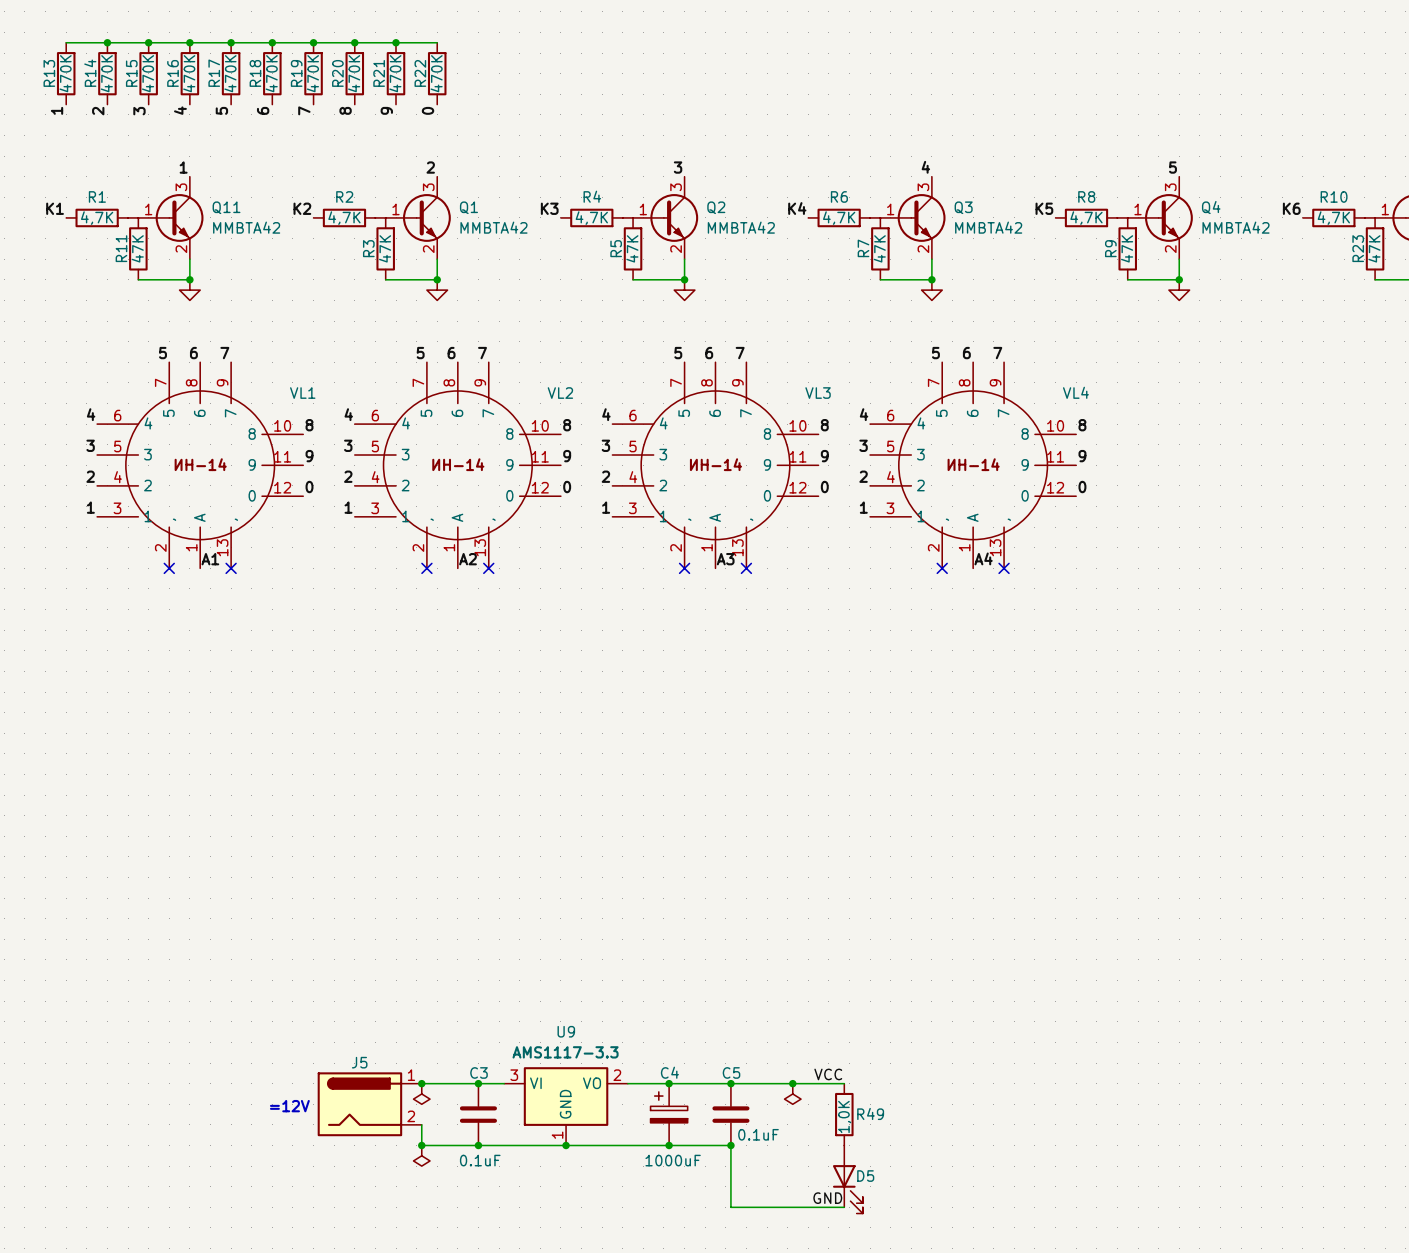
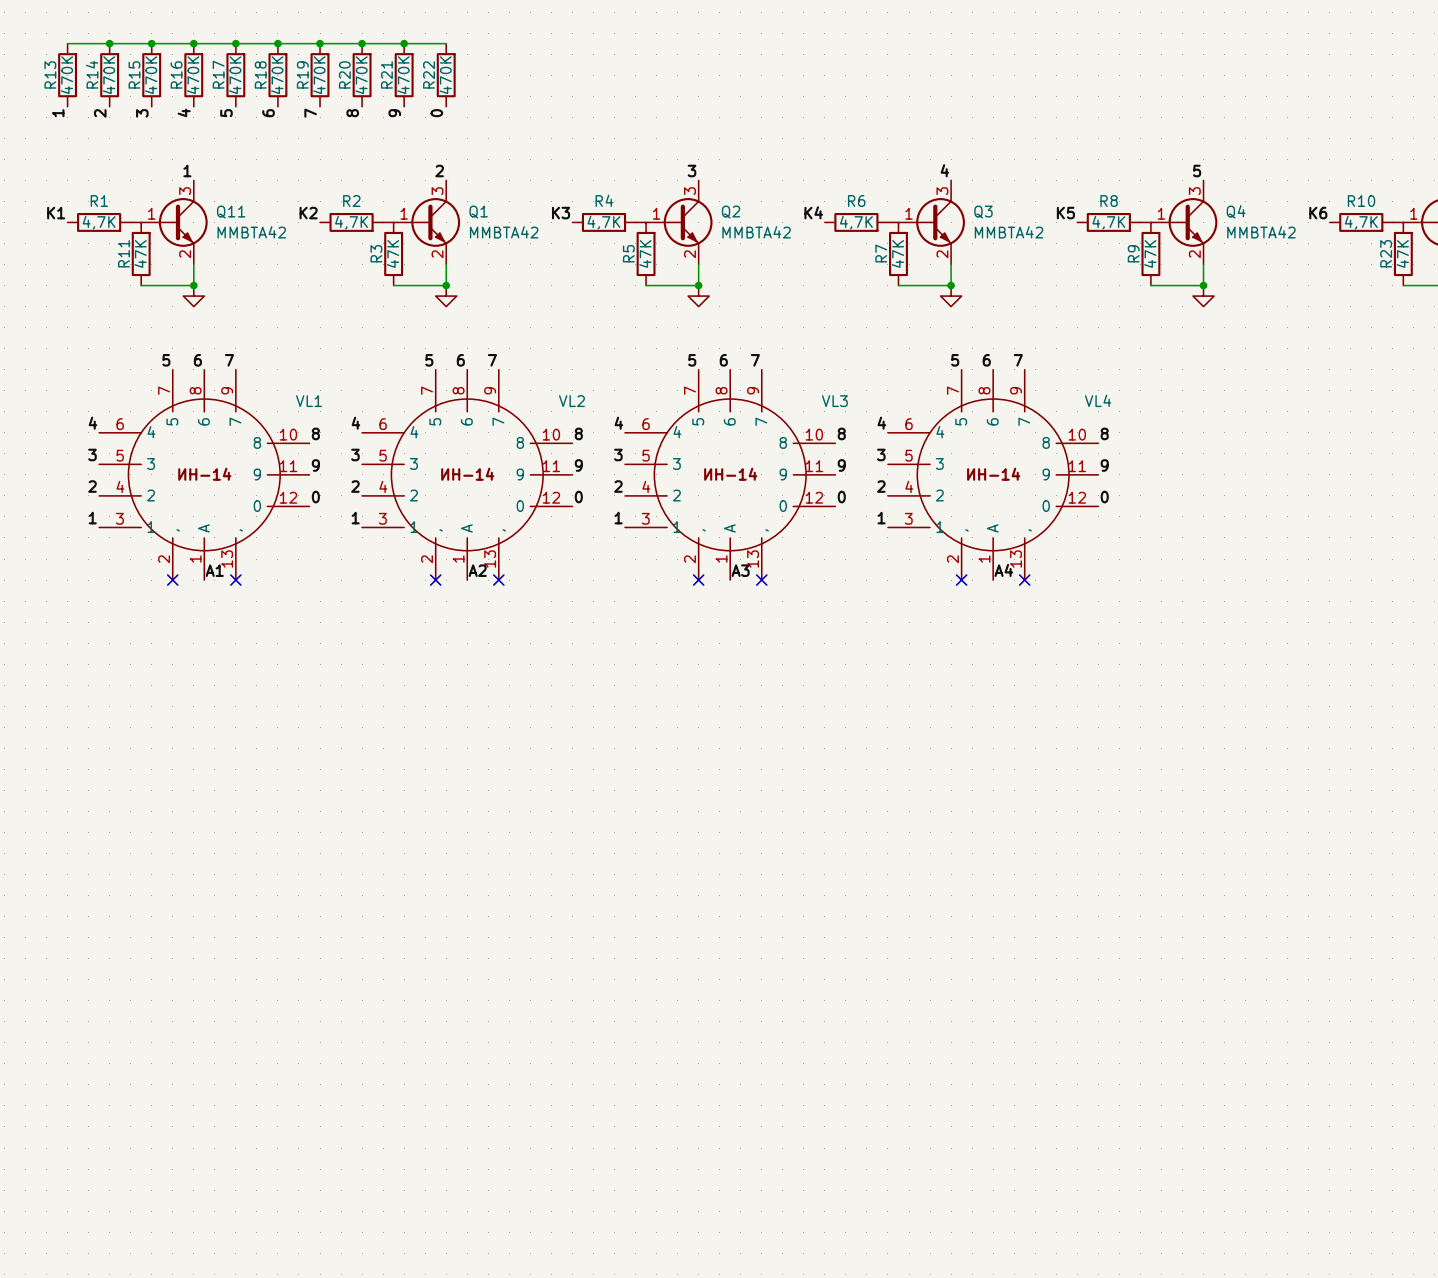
label: VCC (828, 1074) -> none
wire: (421, 1083) (504, 1083) -> none
junction: (421, 1083) -> none
junction: (478, 1083) -> none
wire: (627, 1083) (844, 1083) -> none
junction: (669, 1083) -> none
junction: (730, 1083) -> none
junction: (792, 1083) -> none
power symbol: (421, 1093) -> none
power symbol: (792, 1093) -> none
J5: (369, 1104) -> none
text: =12V (289, 1106) -> none
U9: AMS1117-3.3 (566, 1106) -> none
C3: 0.1uF (478, 1114) -> none
C4: 1000uF (669, 1114) -> none
C5: 0.1uF (730, 1114) -> none
R49: 1,0K (844, 1114) -> none
wire: (421, 1124) (421, 1145) (730, 1145) (730, 1207) (844, 1207) -> none
junction: (421, 1145) -> none
junction: (478, 1145) -> none
junction: (566, 1145) -> none
junction: (669, 1145) -> none
junction: (730, 1145) -> none
power symbol: (421, 1155) -> none
D5: (847, 1179) -> none
label: GND (827, 1198) -> none

